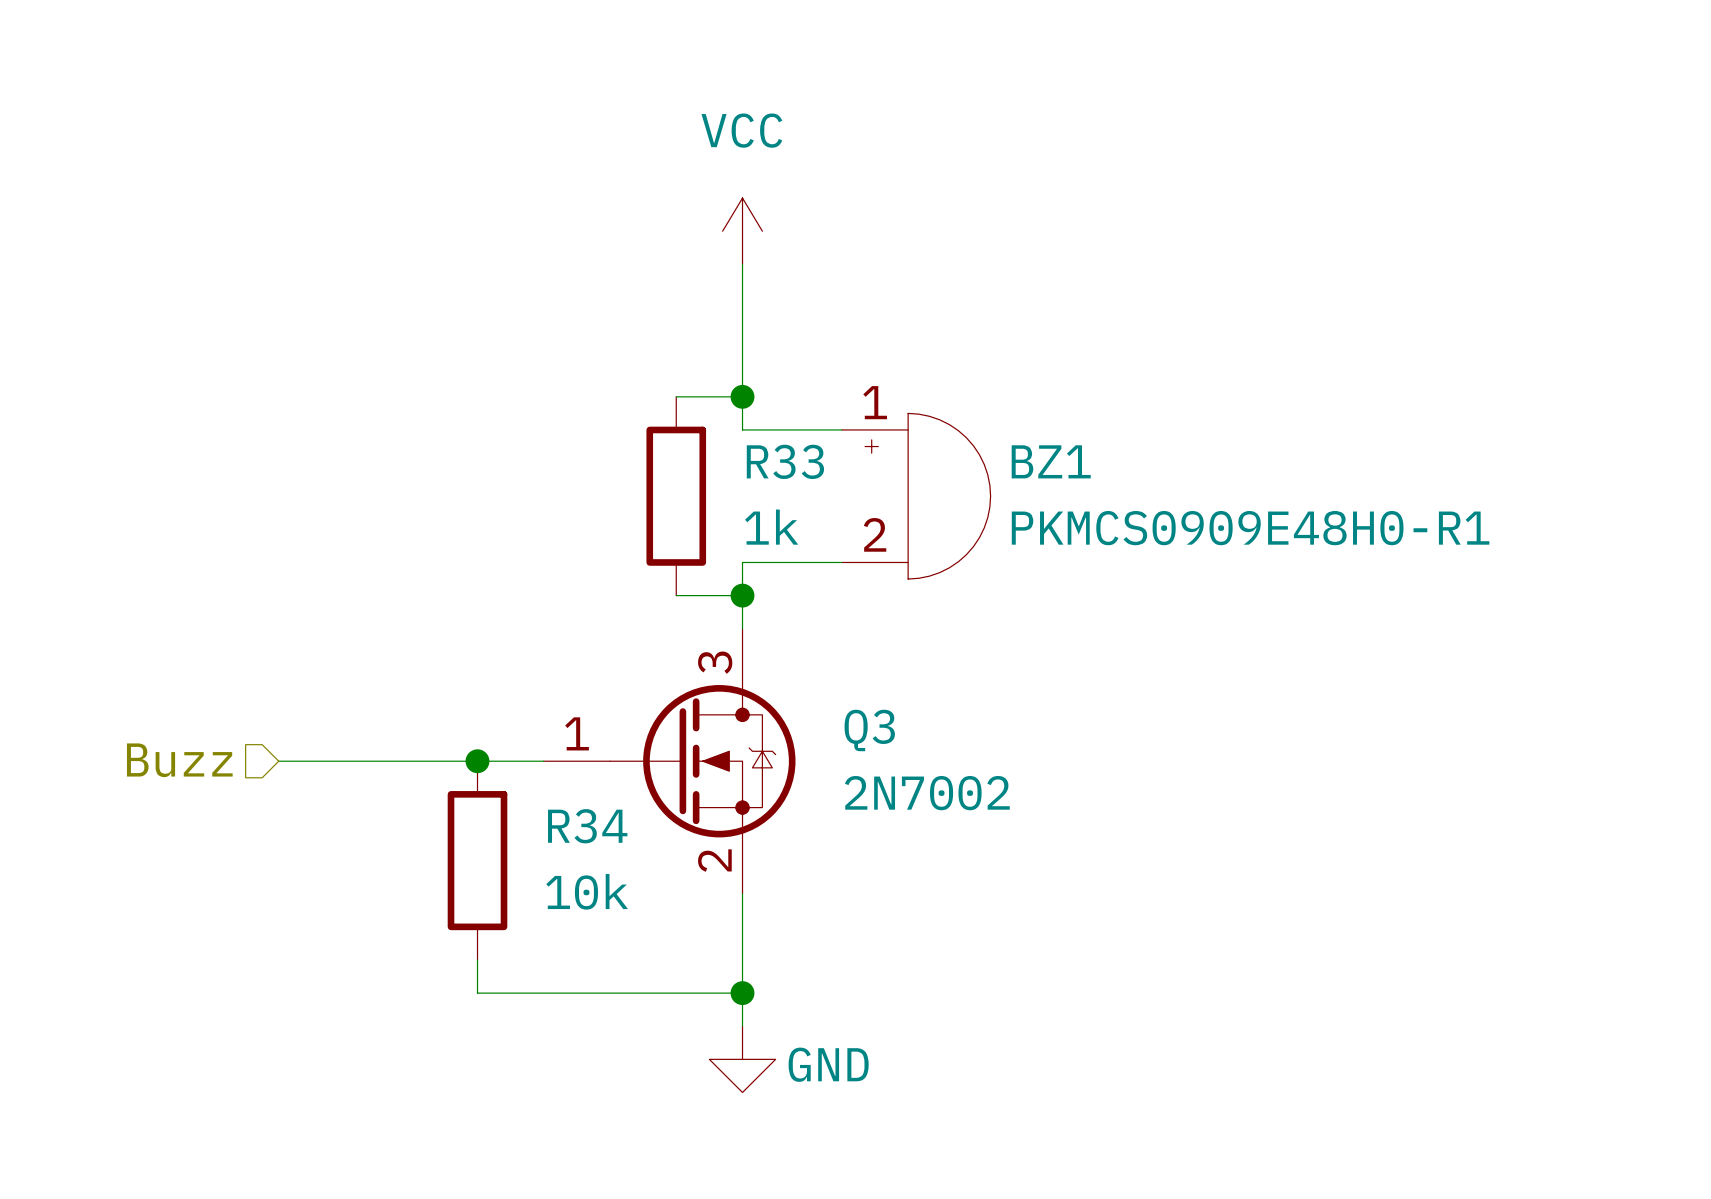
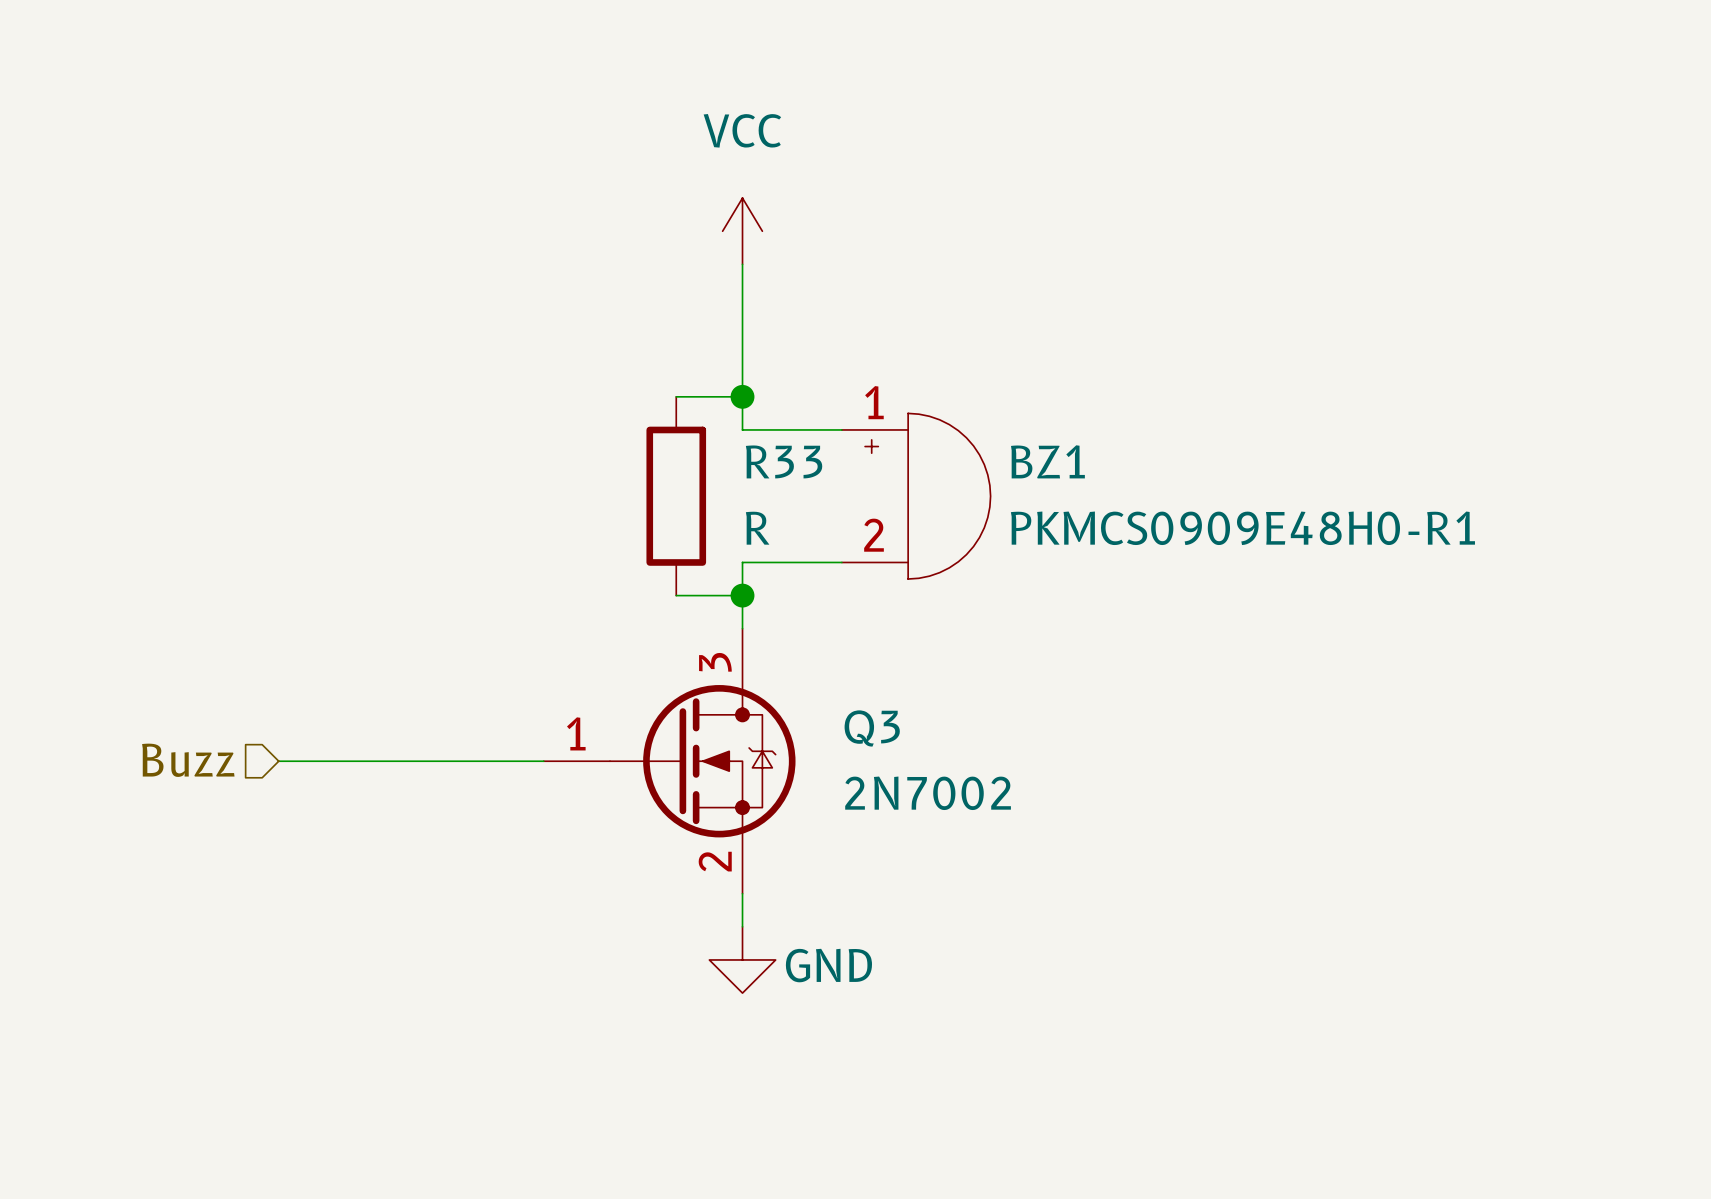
R33 value: 1k (771, 527) -> R (757, 528)
junction: (477, 761) -> none
R34: 10k (477, 860) -> none
wire: (742, 926) (742, 1026) -> none
wire: (477, 959) (477, 993) (742, 993) -> none
junction: (742, 993) -> none
power symbol position: GND (742, 1059) -> GND (742, 959)

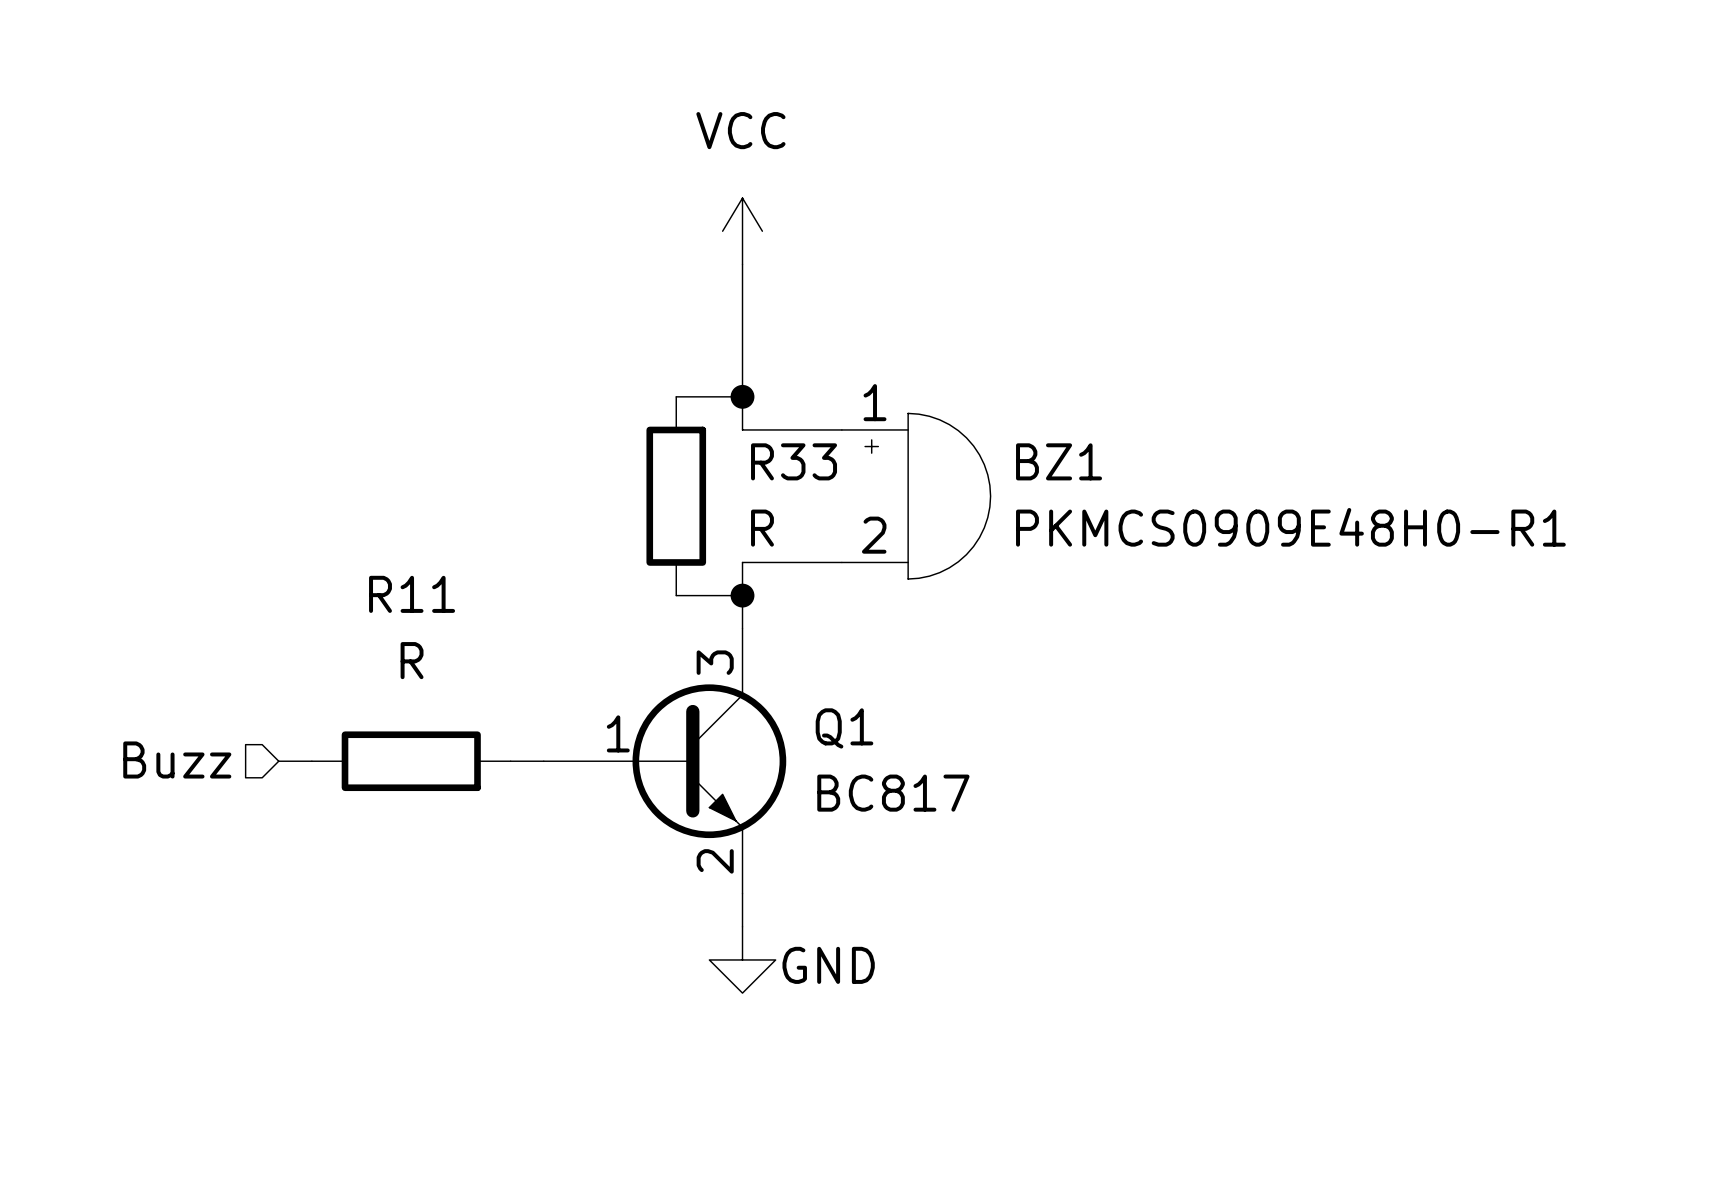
wire: (311, 761) (510, 761) -> none
R11: none -> R (411, 761)
Q1: none -> BC817 (664, 761)
Q3: 2N7002 (669, 761) -> none

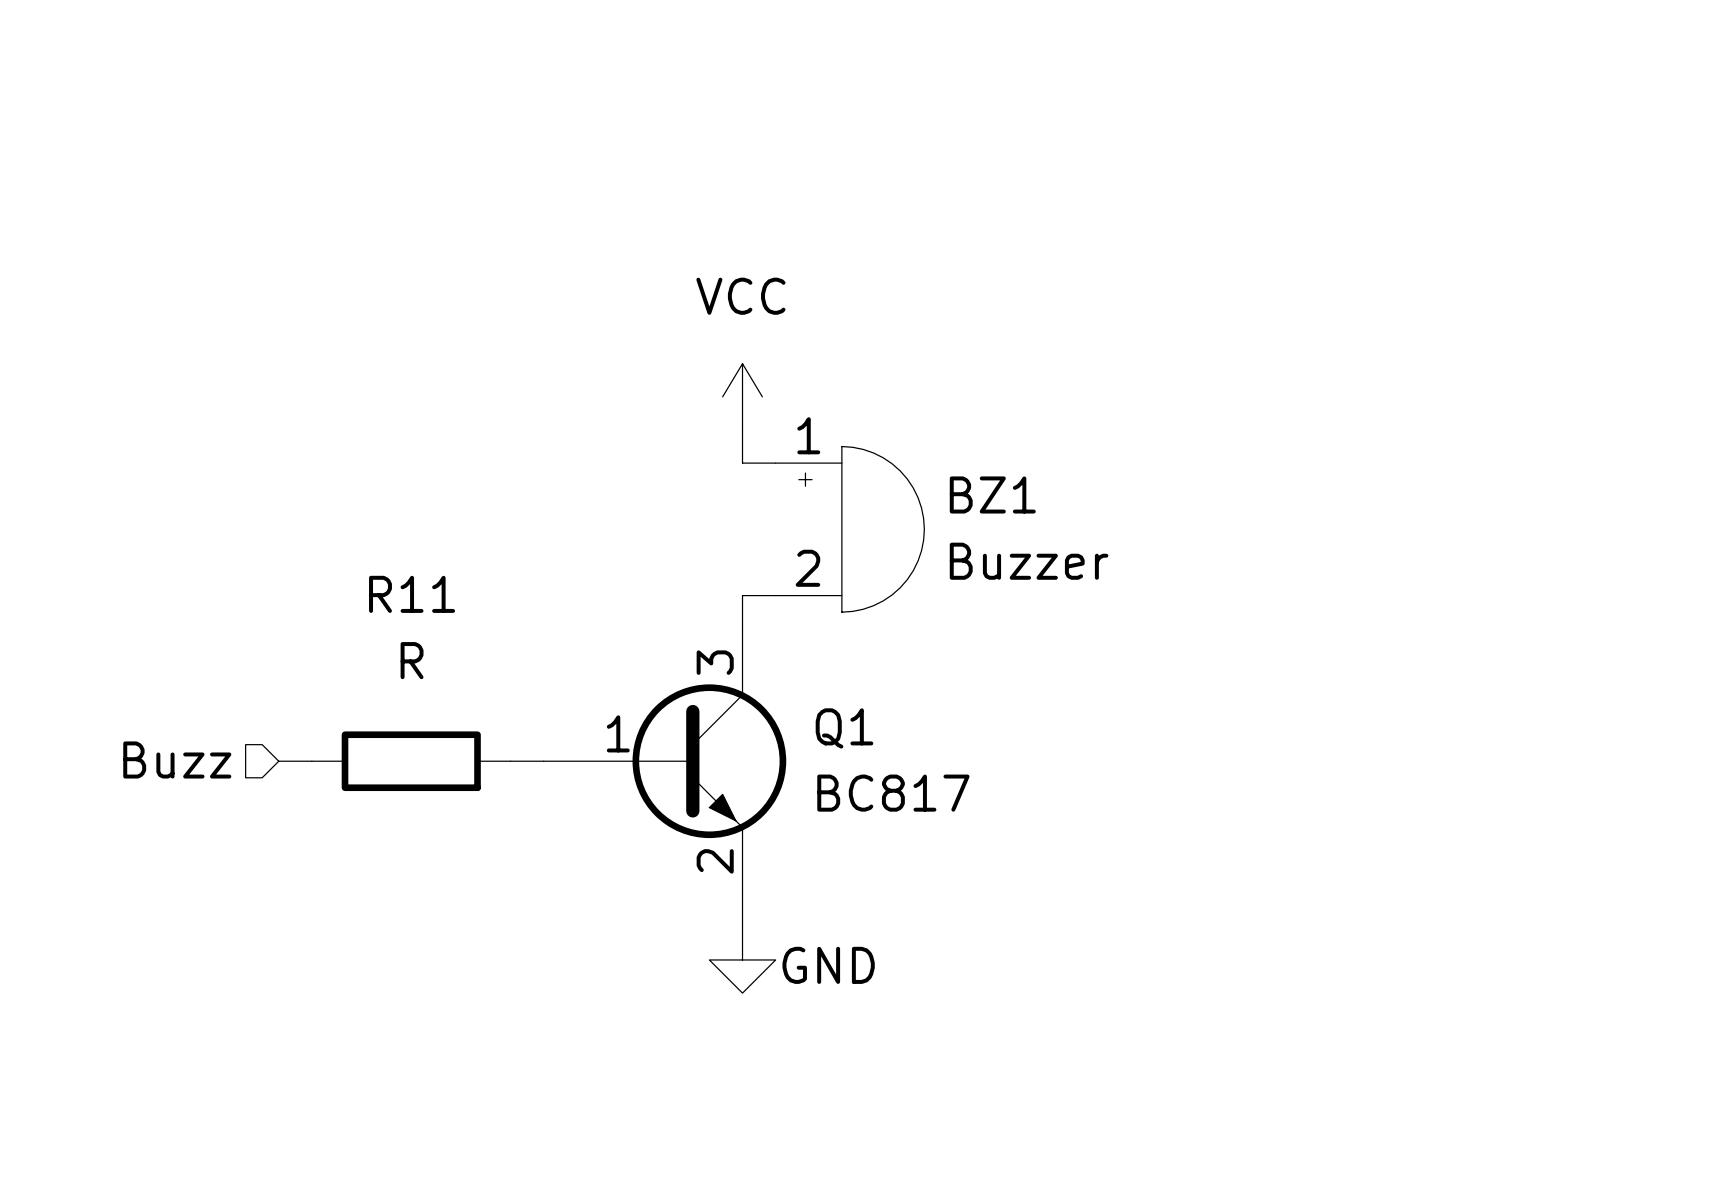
power symbol position: VCC (742, 231) -> VCC (742, 396)
wire: (742, 264) (742, 429) (841, 429) -> none
wire: (676, 396) (742, 396) -> none
junction: (742, 396) -> none
wire: none -> (742, 429) (742, 463) (775, 463)
R33: R (676, 496) -> none
BZ1 position: (916, 496) -> (849, 529)
BZ1 value: PKMCS0909E48H0-R1 (1290, 527) -> Buzzer (1029, 561)
wire: (841, 562) (742, 562) (742, 595) (676, 595) -> none
wire: none -> (742, 595) (775, 595)
junction: (742, 595) -> none

